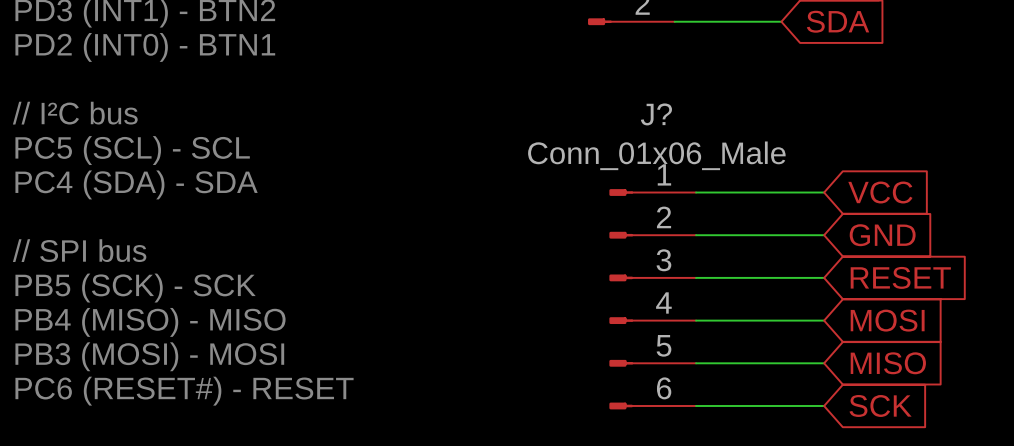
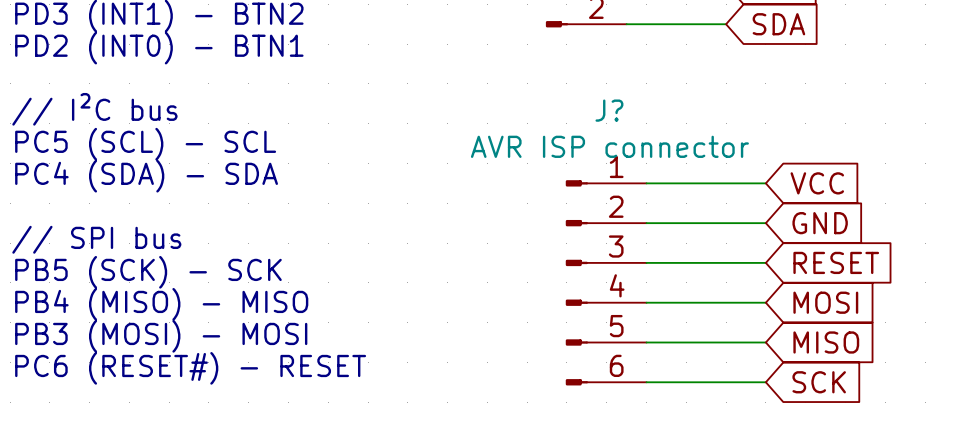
J? value: Conn_01x06_Male (656, 155) -> AVR ISP connector (609, 146)

